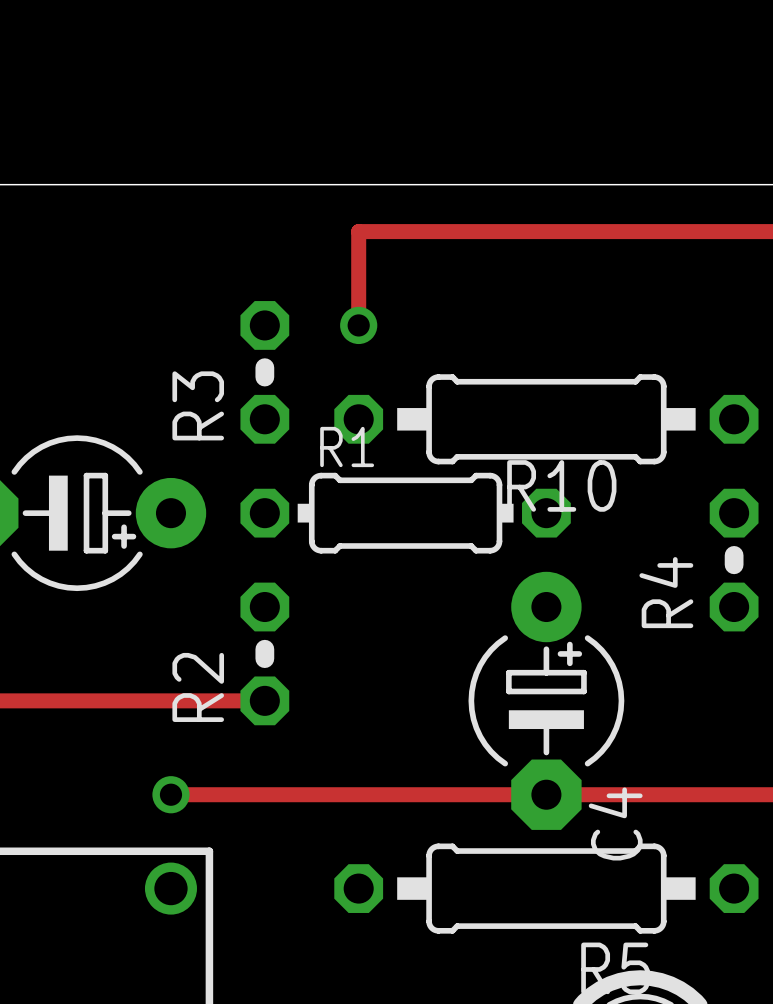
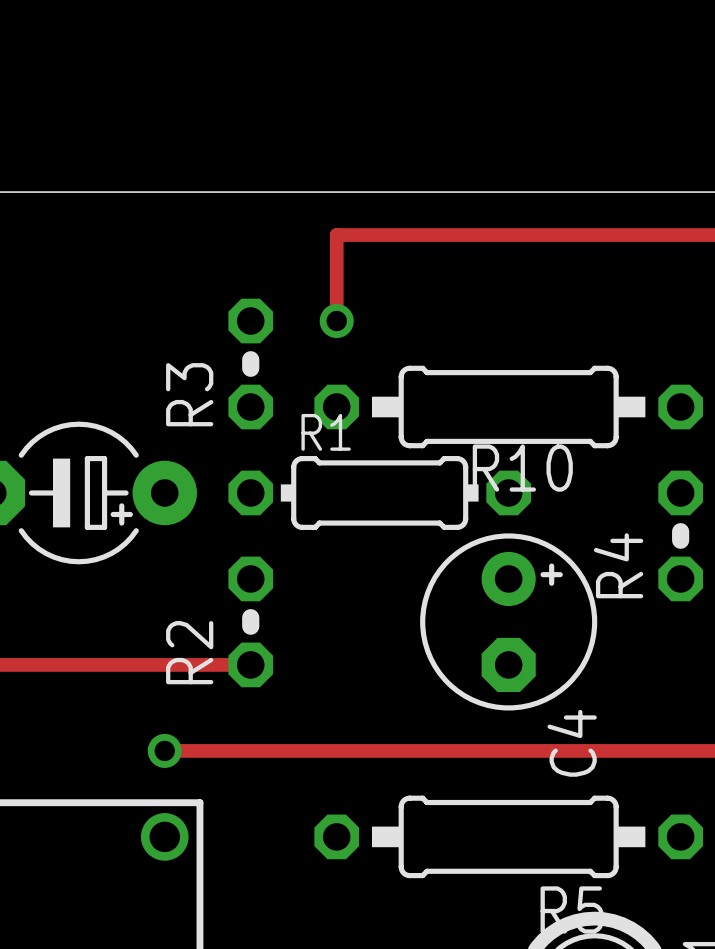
C4 footprint: [468, 571, 625, 830] -> [420, 533, 598, 711]

